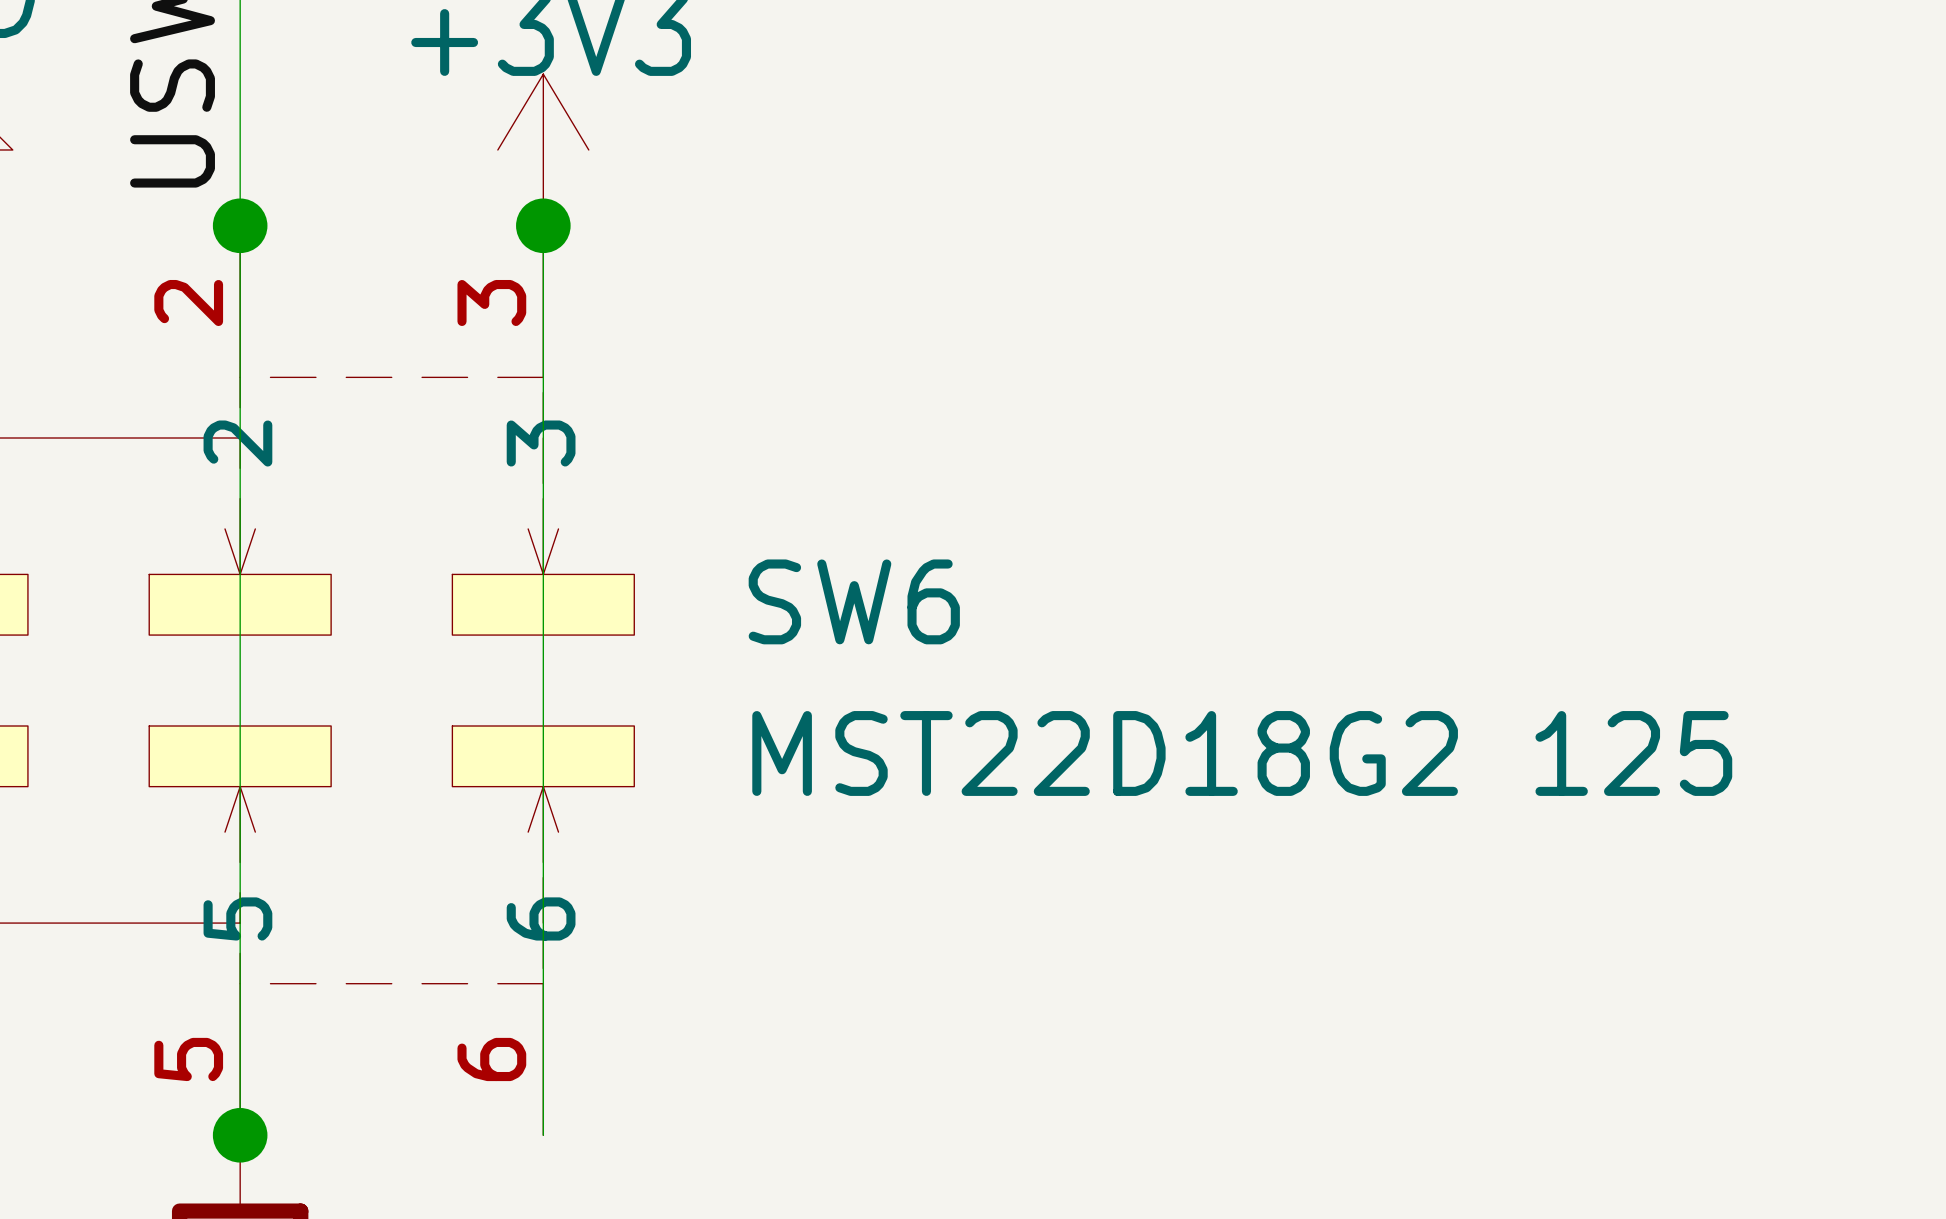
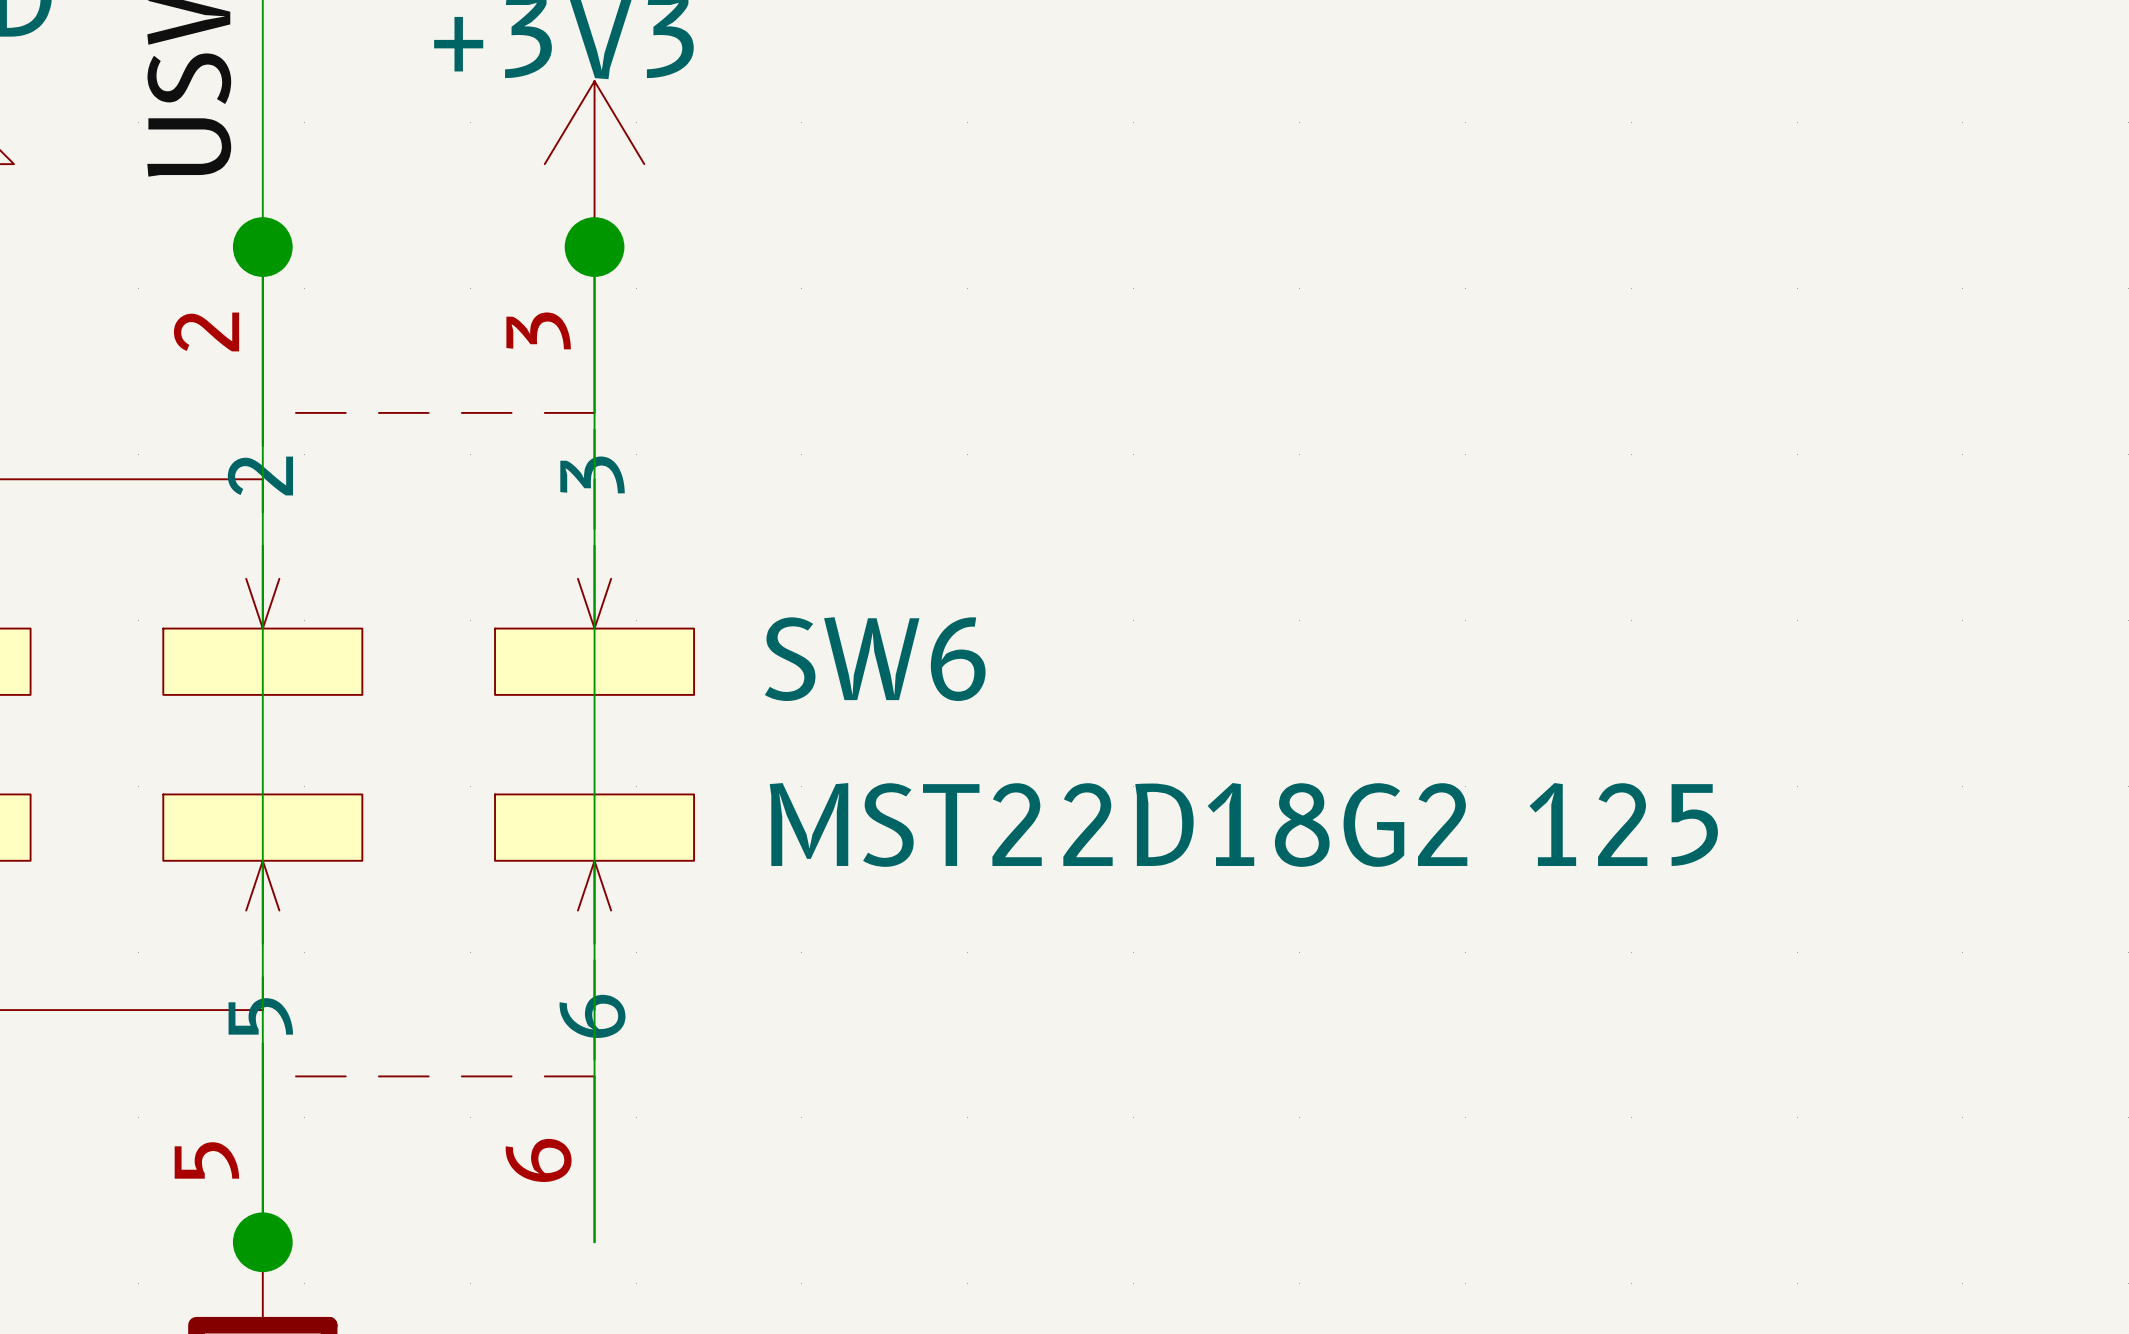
SW6 name position: SW6 (854, 601) -> SW6 (875, 659)
SW6 value position: MST22D18G2 125 (1242, 753) -> MST22D18G2 125 (1243, 824)

